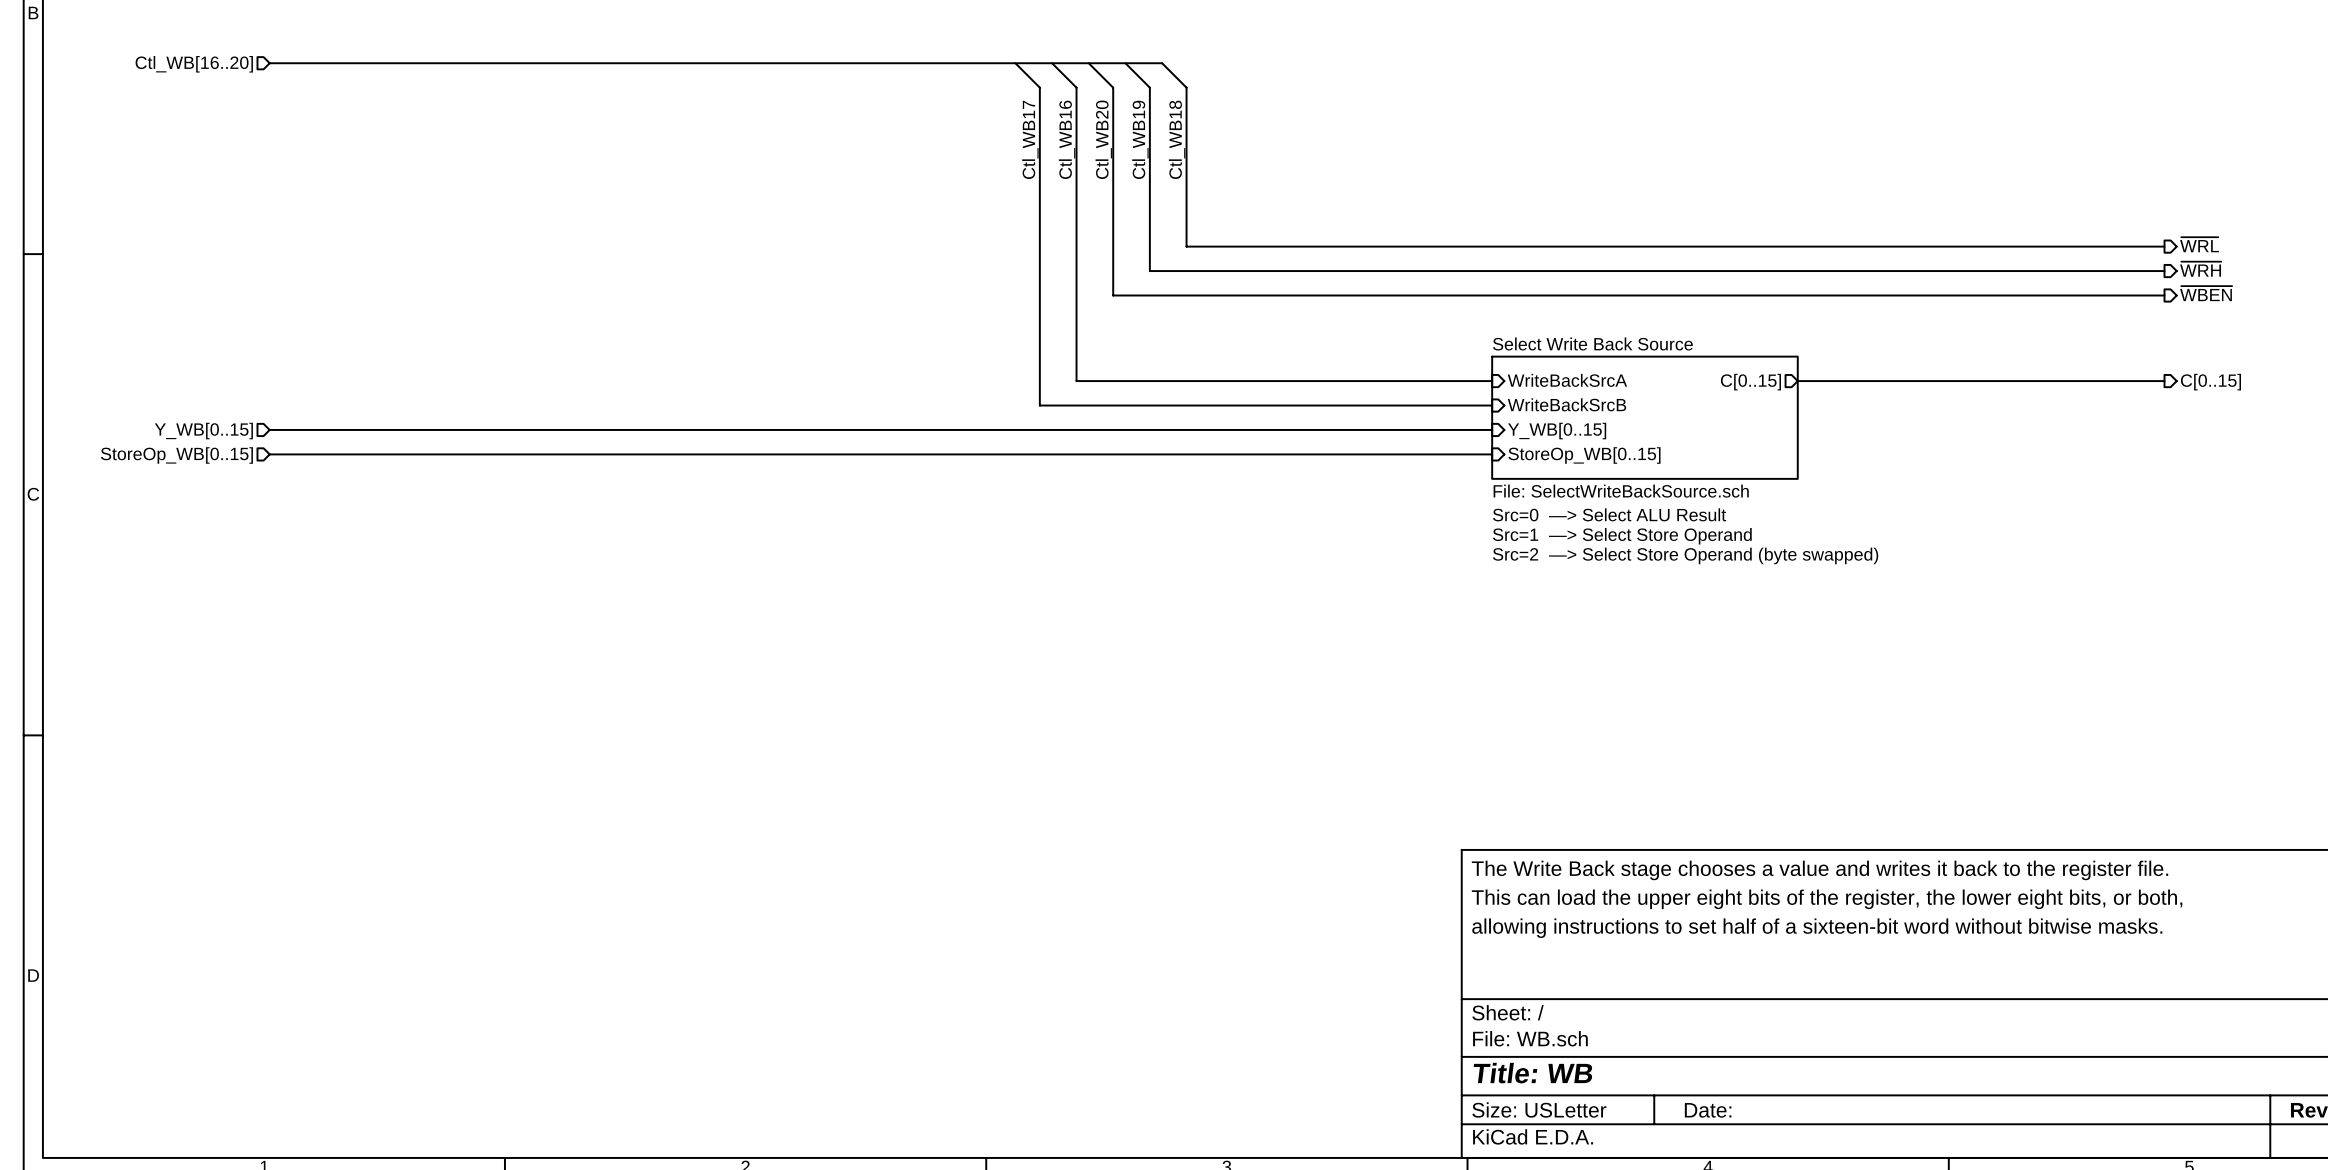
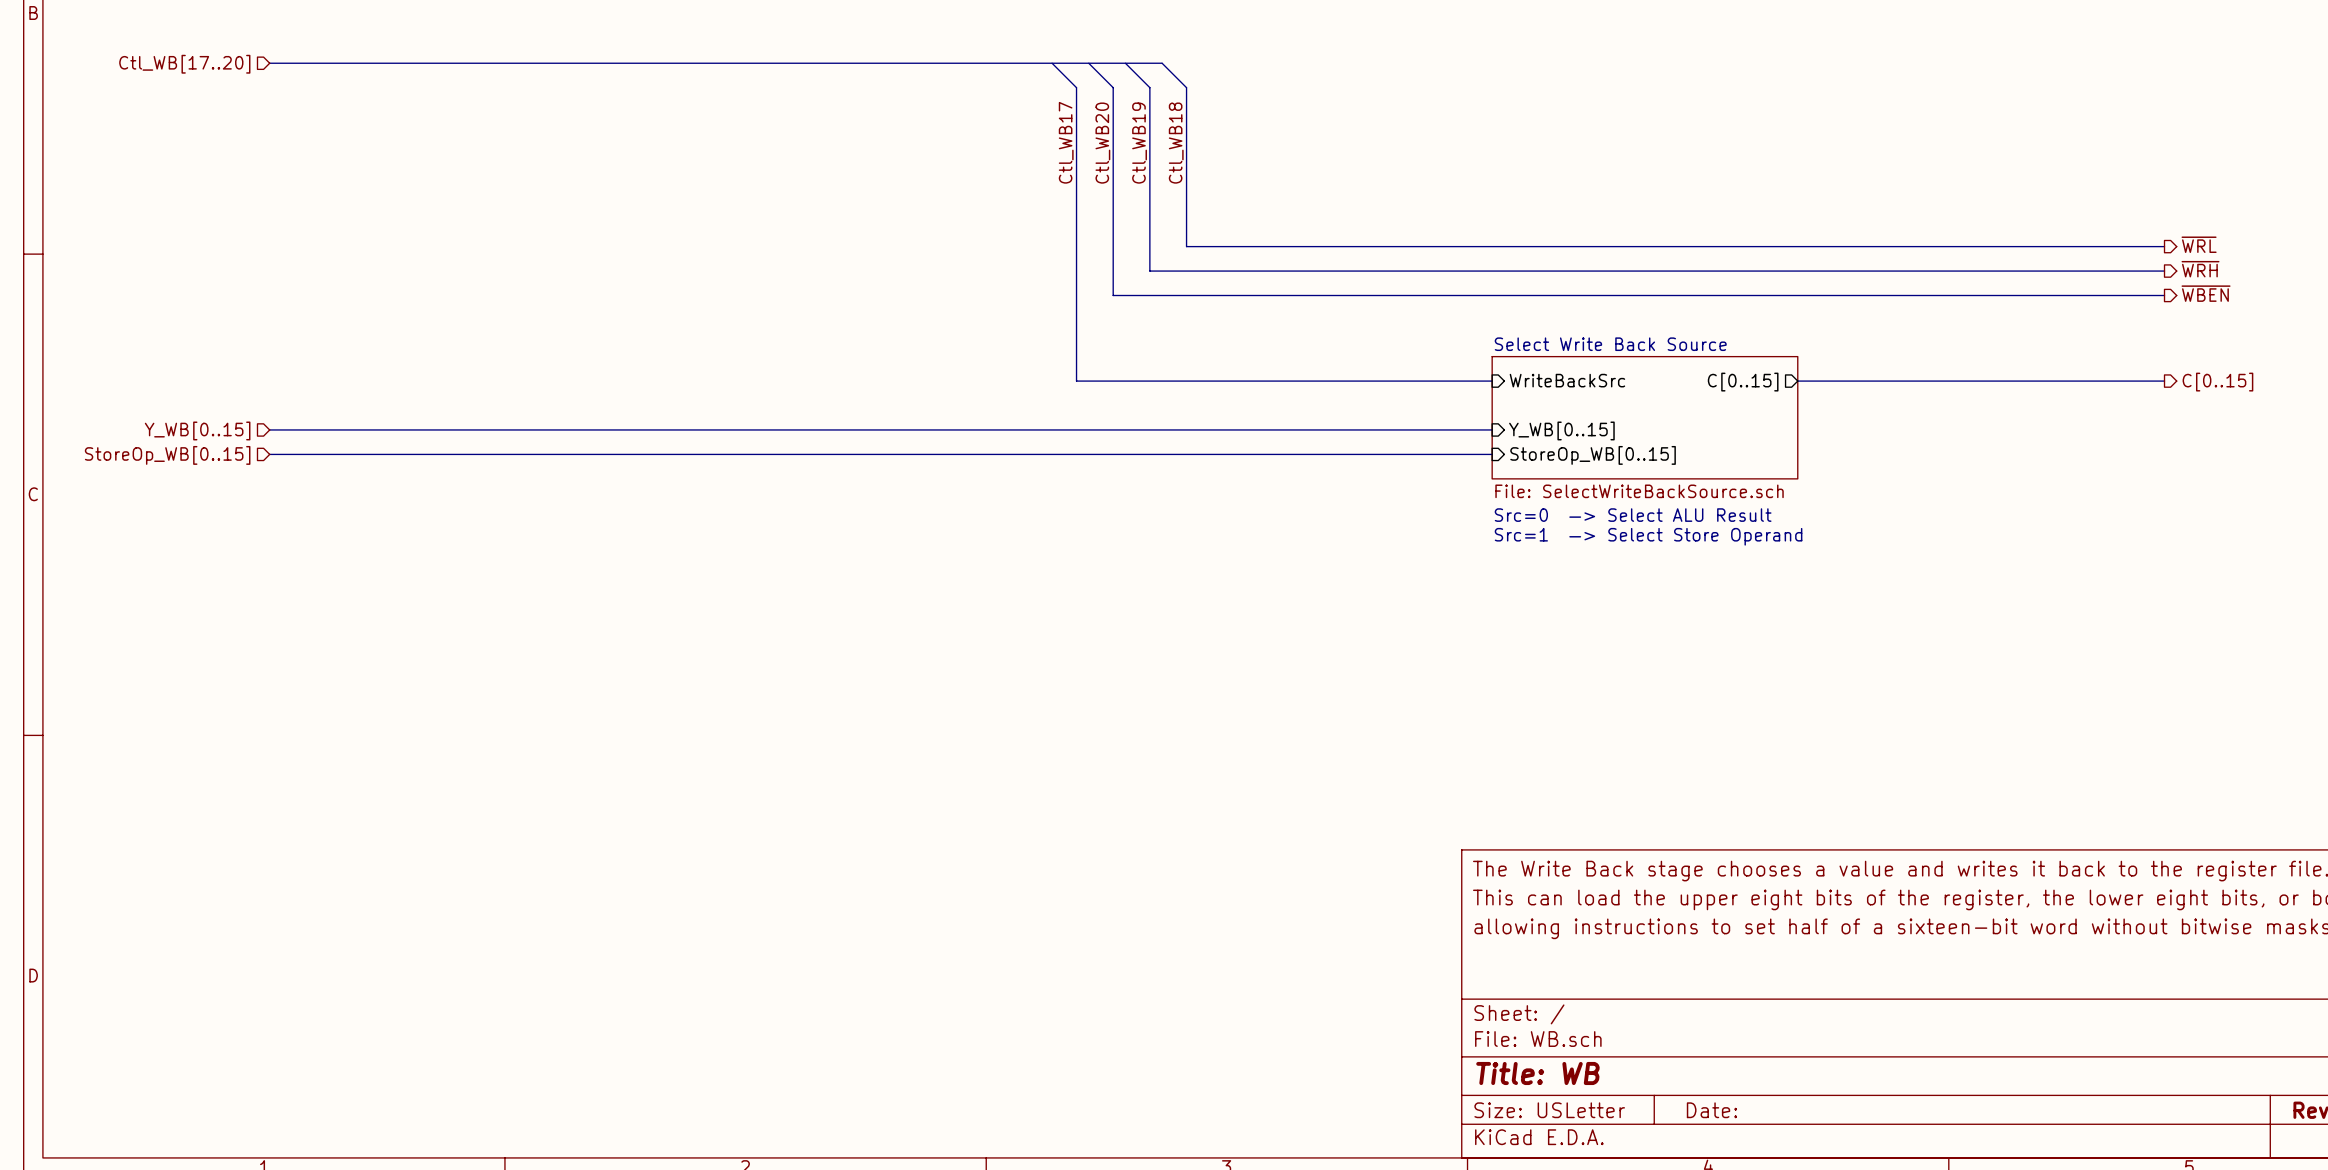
wire: (1015, 63) (1039, 87) (1039, 405) (1492, 405) -> none
hierarchical label: Ctl_WB[16..20] (194, 64) -> Ctl_WB[17..20] (184, 64)
label: Ctl_WB17 (1030, 139) -> none
label: Ctl_WB16 (1067, 139) -> Ctl_WB17 (1066, 142)
sheet pin: WriteBackSrcA (1567, 380) -> WriteBackSrc (1567, 380)
sheet pin: WriteBackSrcB (1566, 404) -> none
text: Src=2 —> Select Store Operand (byte swapped) (1685, 555) -> none

